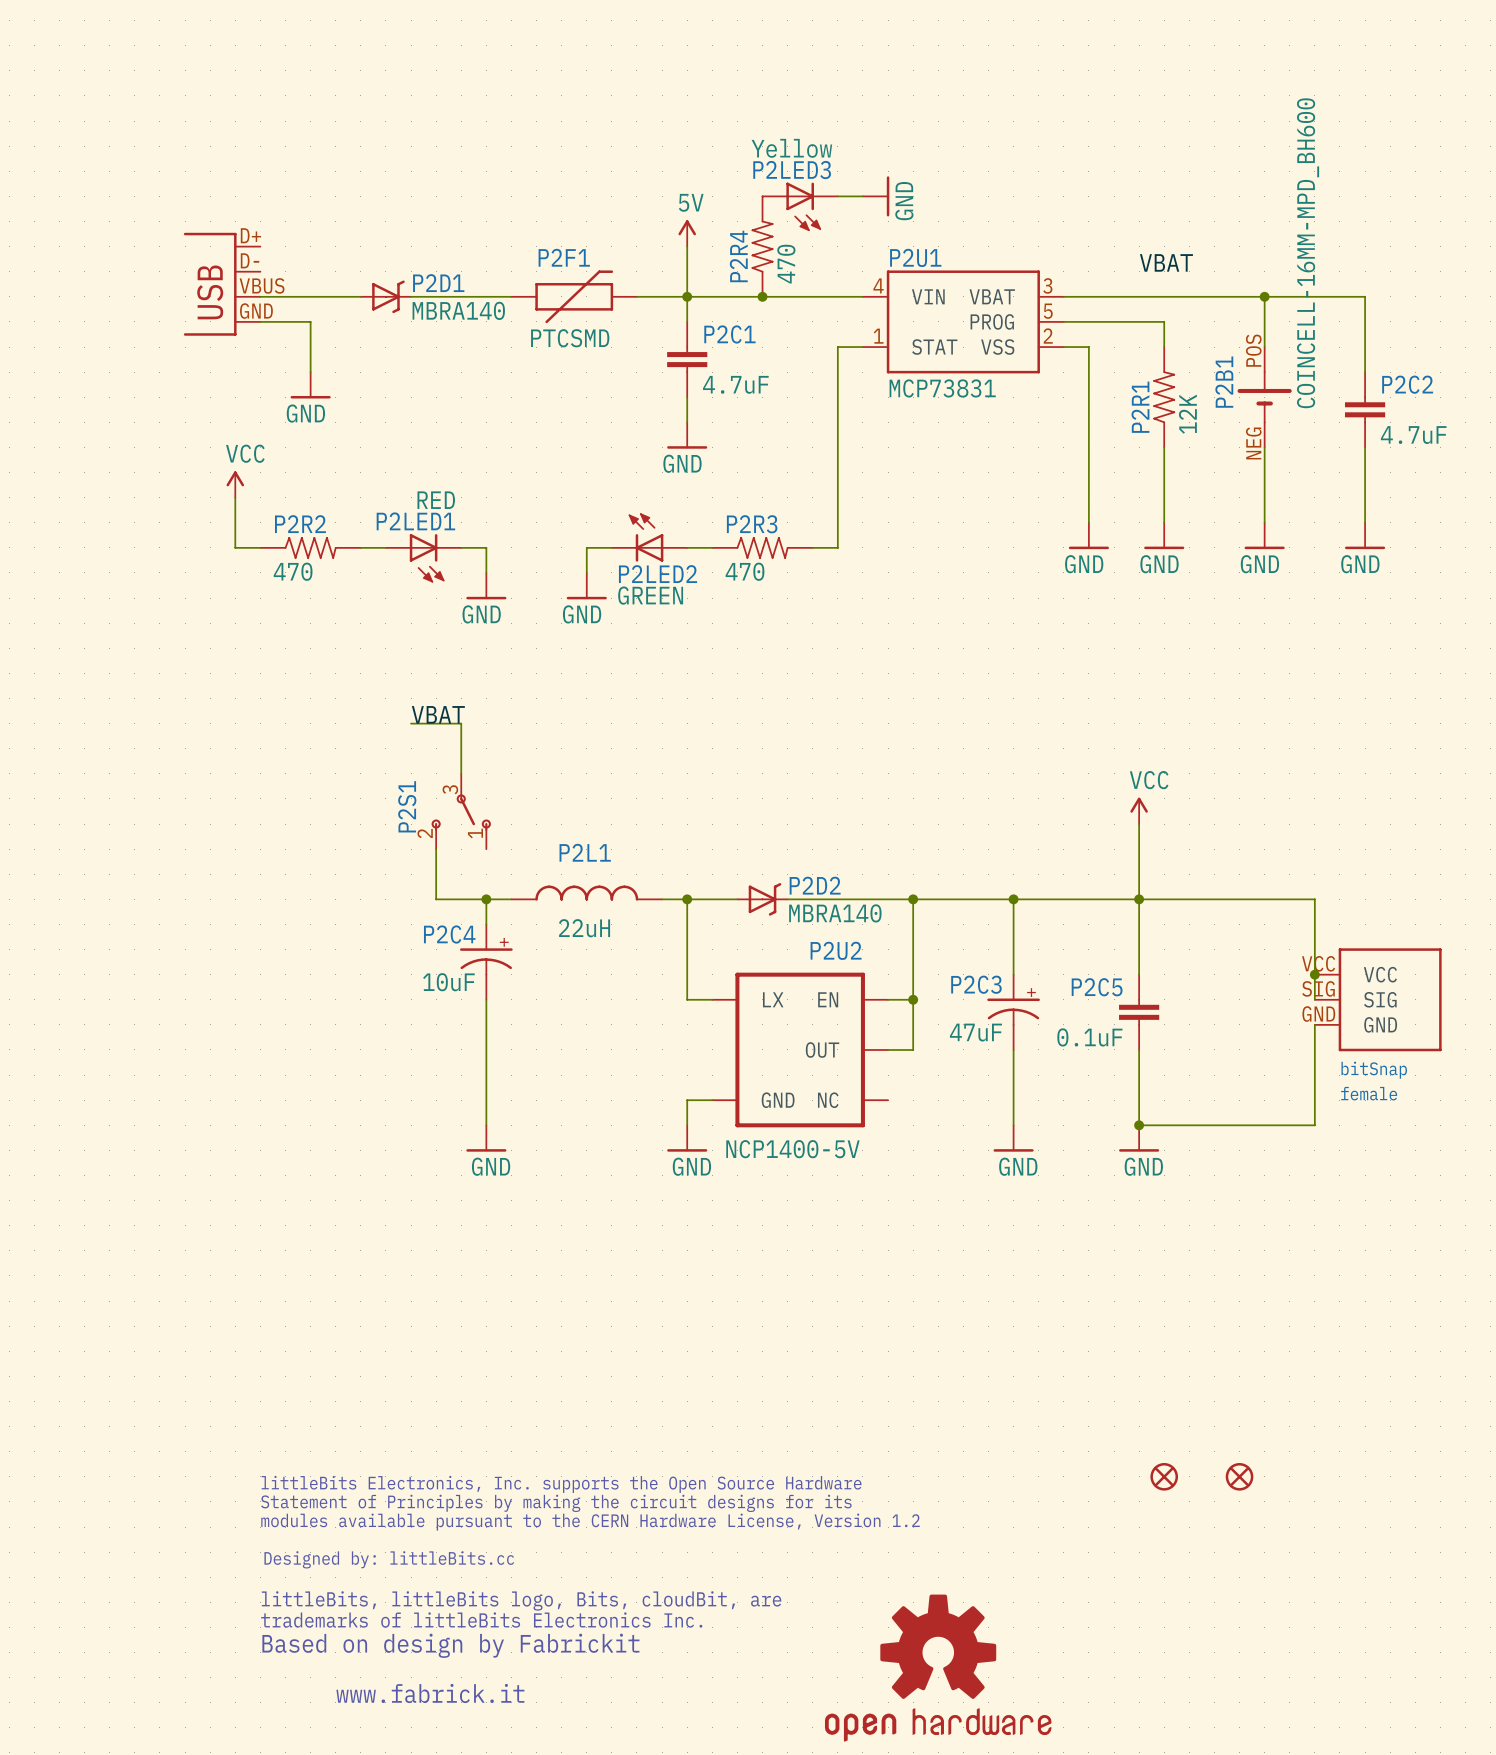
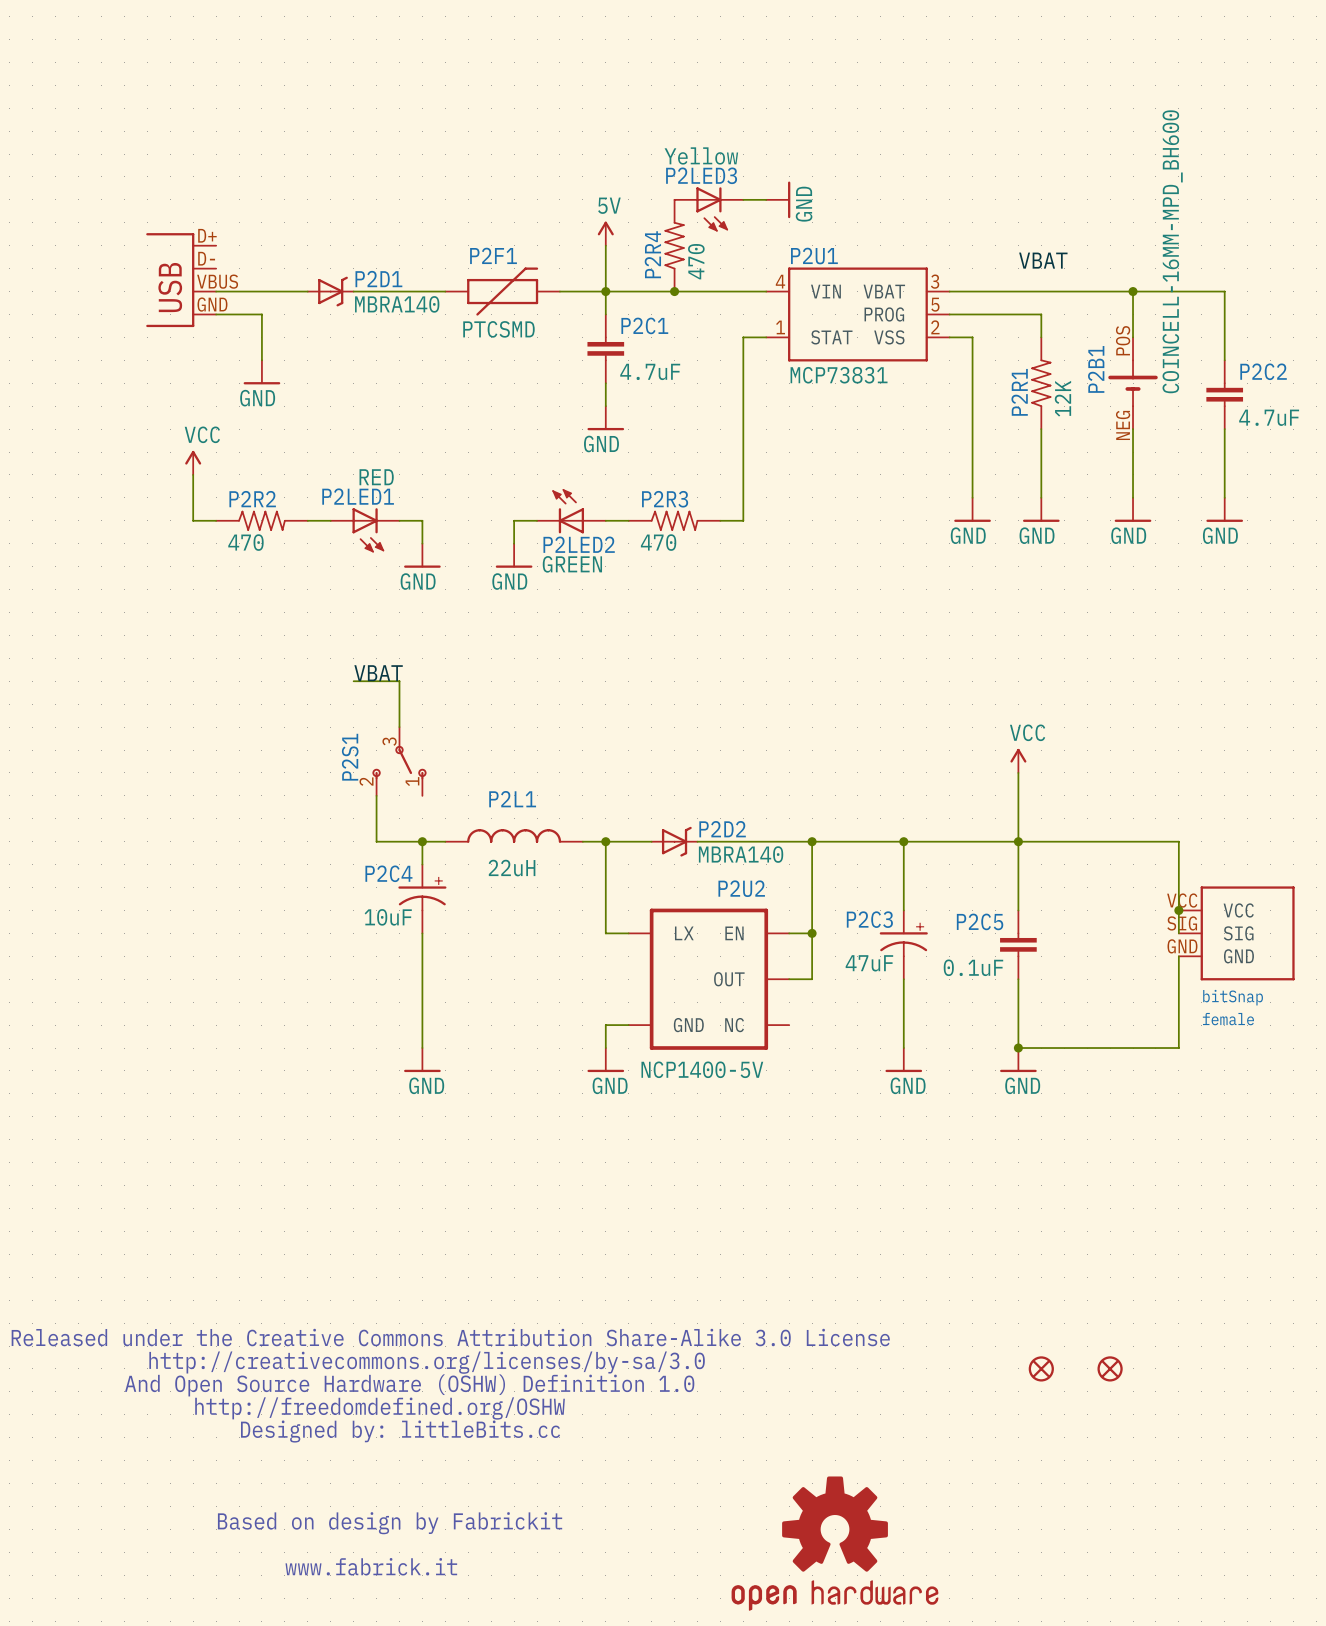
part: none -> (450, 1385)
part: (590, 1551) -> none

